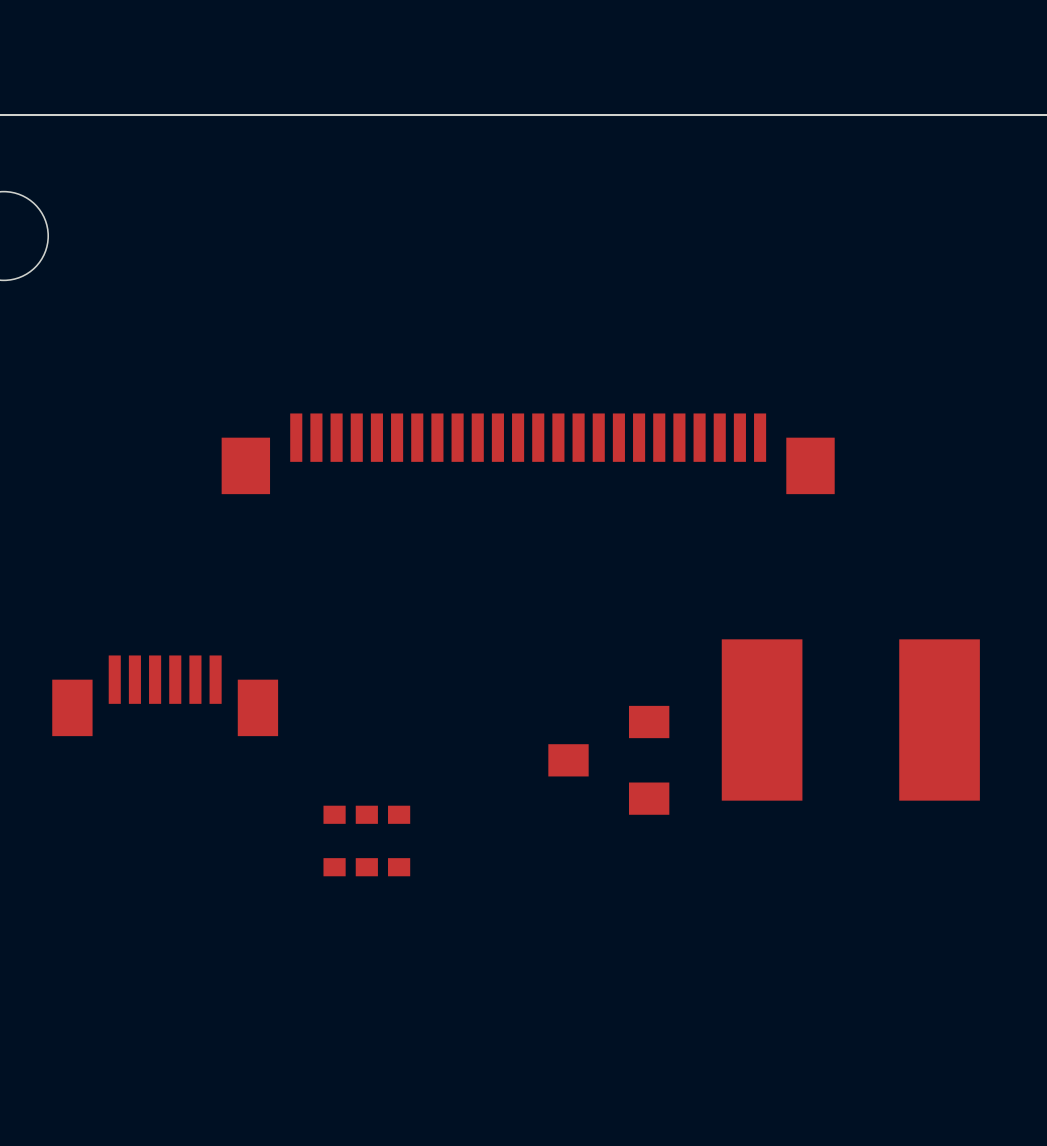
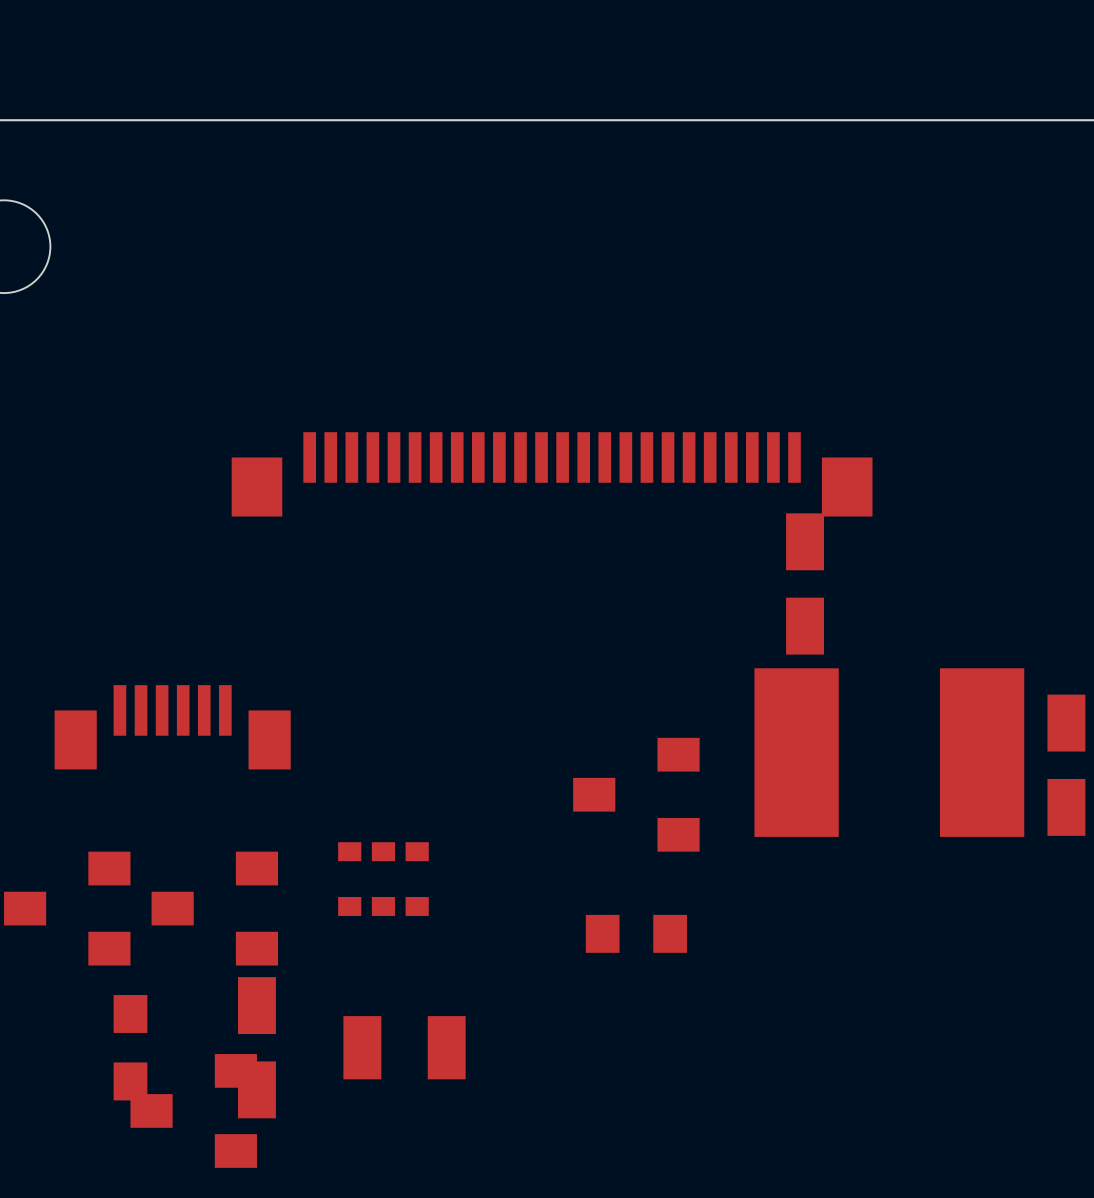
part: none -> (805, 583)
part: none -> (1066, 765)
part: none -> (67, 908)
part: none -> (214, 908)
part: none -> (636, 933)
part: none -> (130, 1047)
part: none -> (256, 1047)
part: none -> (404, 1047)
part: none -> (193, 1110)

